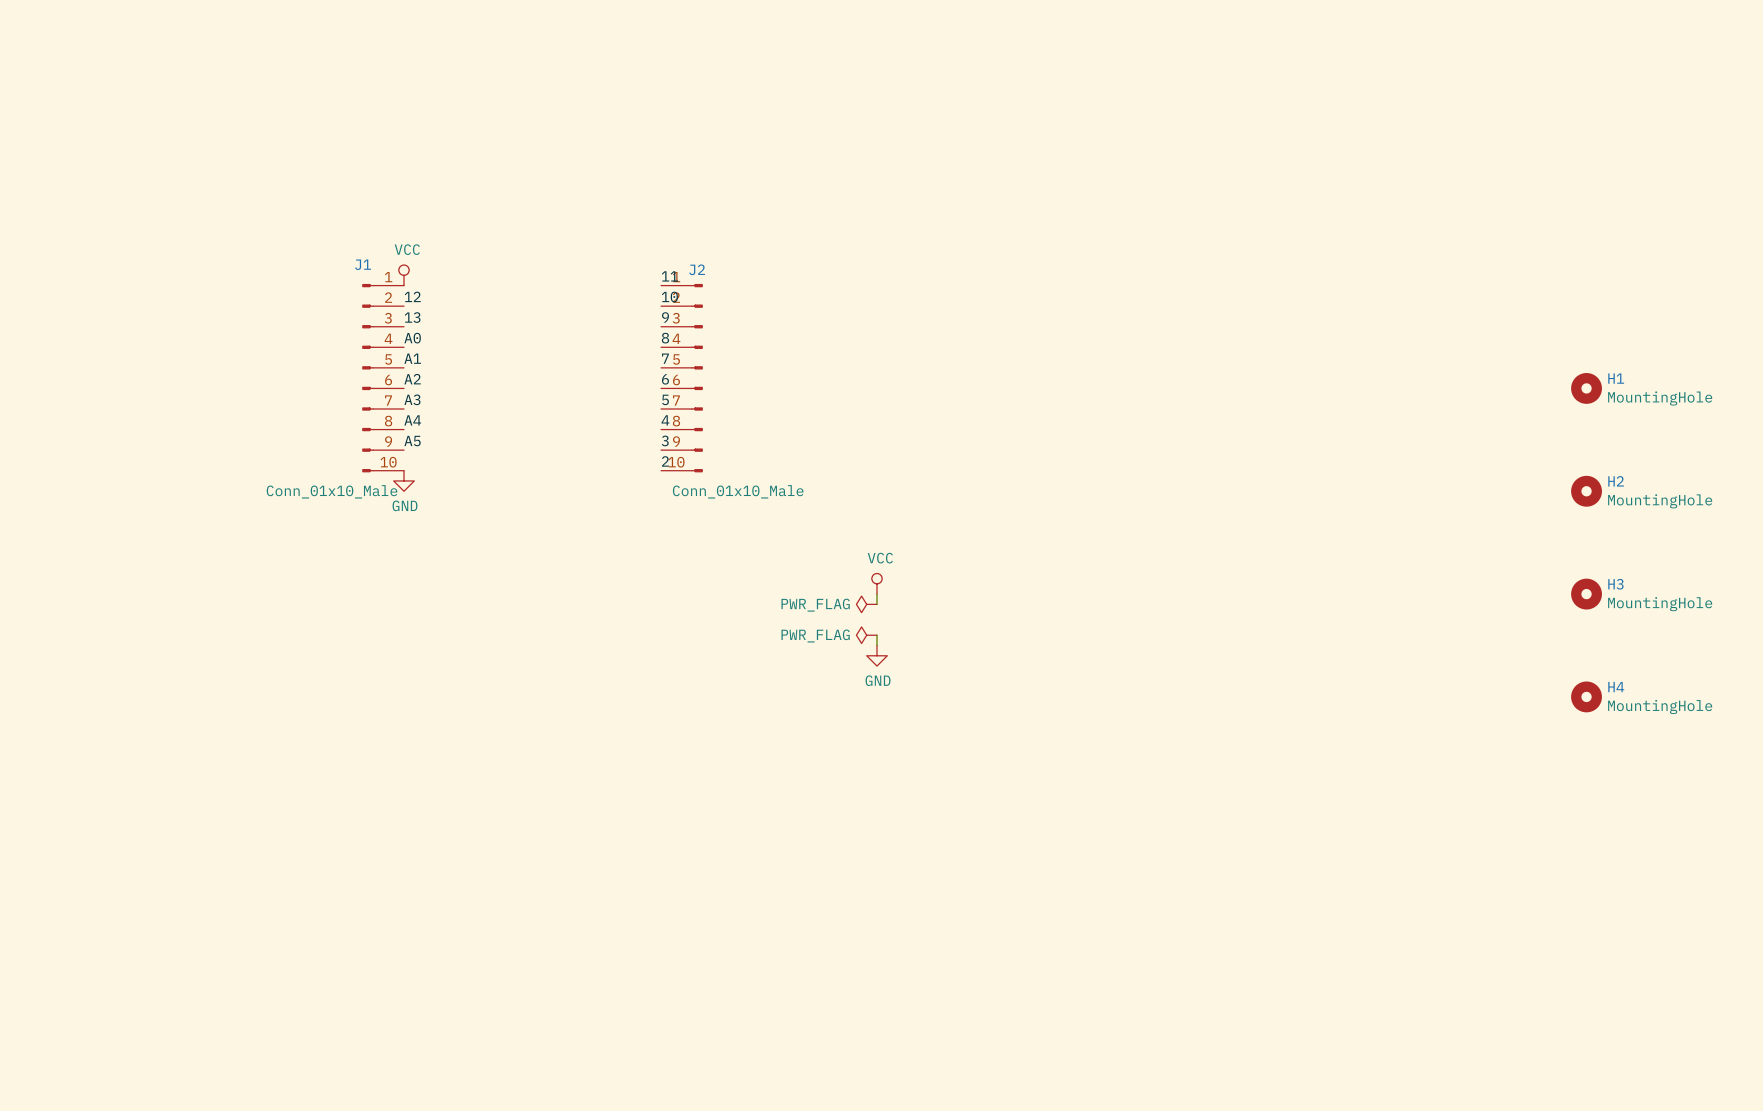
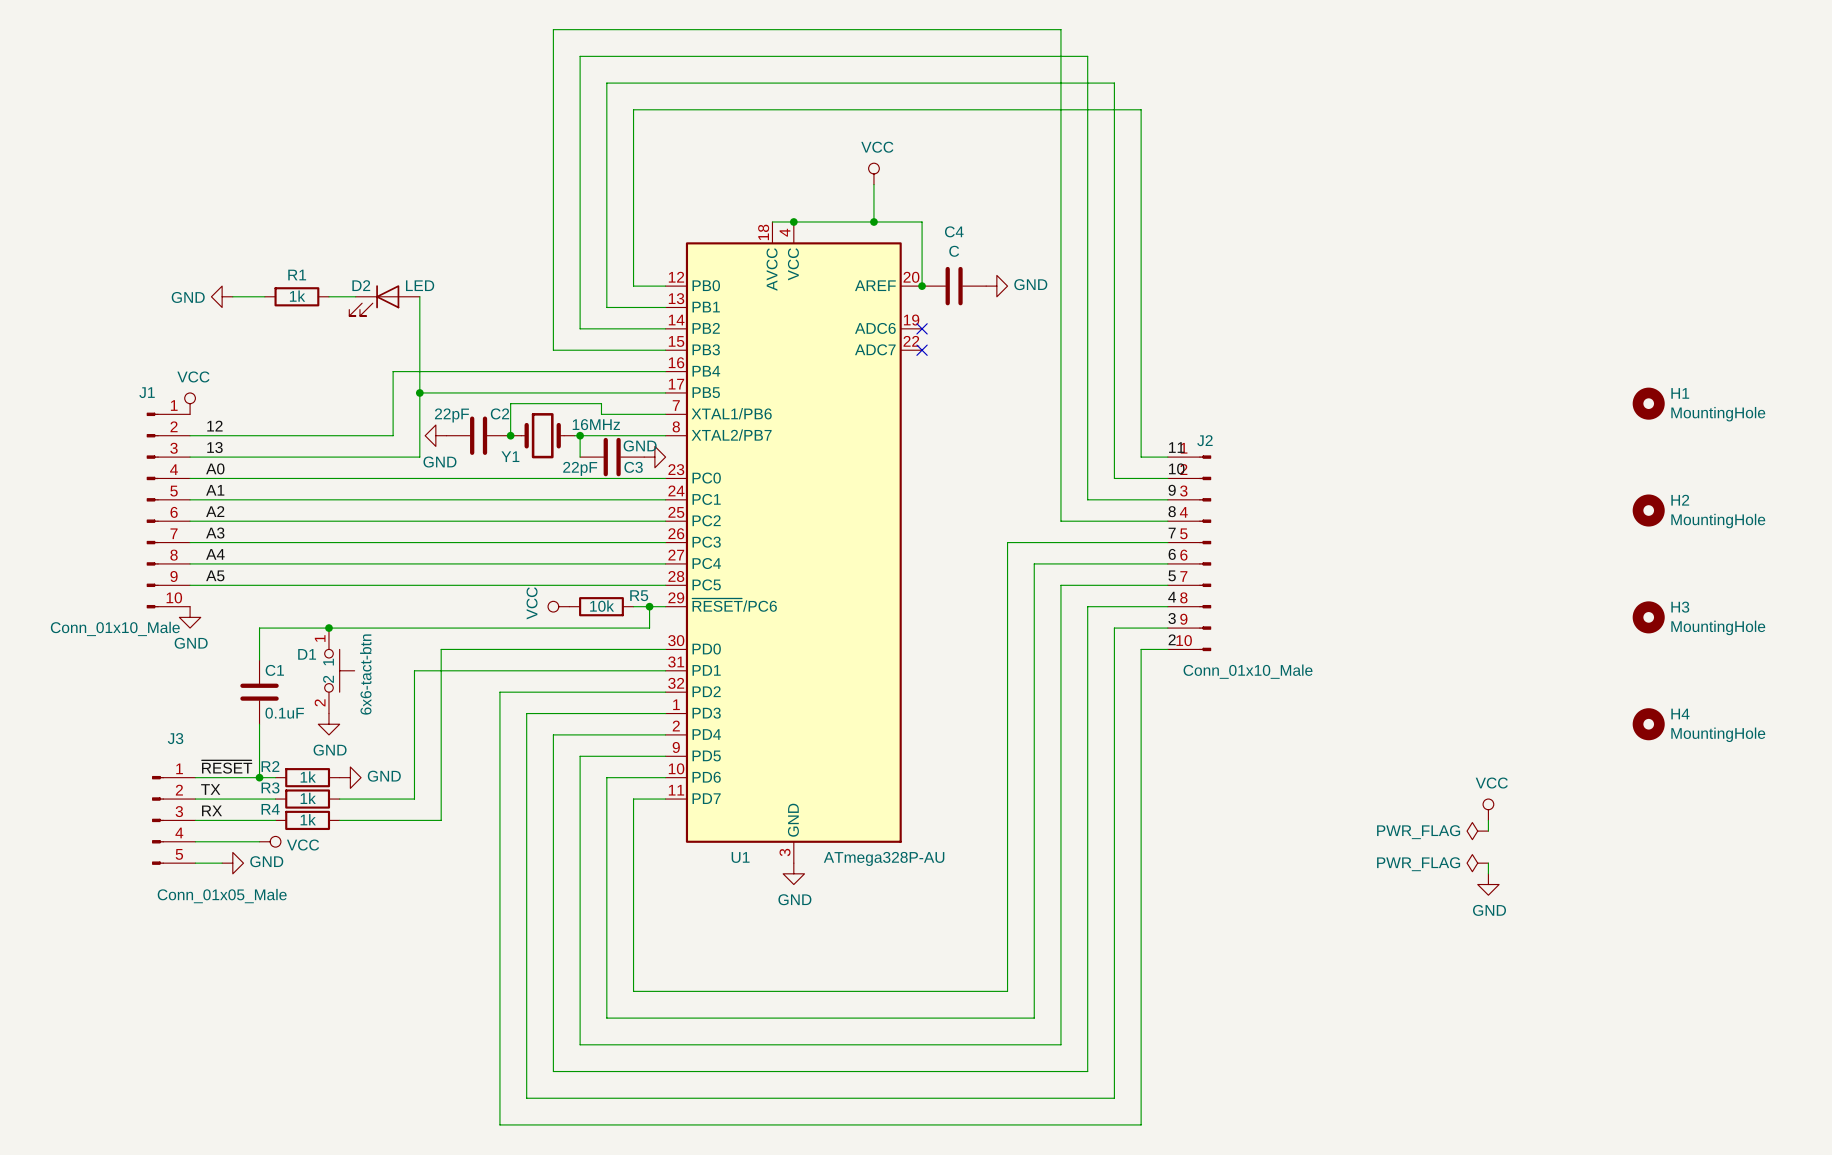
power symbol: none -> VCC (873, 173)
wire: none -> (873, 184) (873, 221)
wire: none -> (772, 221) (922, 221) (922, 286)
junction: none -> (793, 221)
junction: none -> (873, 221)
power symbol: VCC (403, 275) -> none
wire: none -> (665, 286) (633, 286) (633, 109) (1141, 109) (1141, 457) (1167, 457)
junction: none -> (922, 286)
C4: none -> C (954, 286)
power symbol: none -> GND (996, 286)
label: 11 (669, 276) -> none
power symbol: none -> GND (222, 296)
wire: none -> (232, 296) (264, 296)
R1: none -> 1k (296, 296)
wire: none -> (328, 296) (355, 296)
wire: none -> (419, 296) (419, 457) (190, 457)
D2: none -> LED (384, 300)
wire: none -> (665, 307) (606, 307) (606, 83) (1114, 83) (1114, 478) (1167, 478)
label: 12 (412, 296) -> none
label: 10 (669, 296) -> none
wire: none -> (665, 328) (580, 328) (580, 56) (1087, 56) (1087, 499) (1167, 499)
no-connect mark: none -> (922, 328)
label: 13 (412, 317) -> none
label: 9 (665, 317) -> none
wire: none -> (665, 350) (553, 350) (553, 29) (1060, 29) (1060, 521) (1167, 521)
no-connect mark: none -> (922, 350)
label: A0 (412, 338) -> none
label: 8 (665, 338) -> none
wire: none -> (665, 371) (393, 371) (393, 435) (190, 435)
label: A1 (412, 358) -> none
label: 7 (665, 358) -> none
J1 position: (383, 378) -> (168, 510)
wire: none -> (419, 392) (665, 392)
junction: none -> (419, 392)
J2 position: (681, 378) -> (1189, 553)
label: A2 (412, 379) -> none
label: 6 (665, 379) -> none
power symbol: none -> VCC (190, 403)
wire: none -> (665, 414) (601, 414) (601, 403) (510, 403) (510, 435)
label: A3 (412, 399) -> none
label: 5 (665, 399) -> none
label: none -> 12 (214, 426)
C2: none -> 22pF (478, 435)
junction: none -> (510, 435)
Y1: none -> 16MHz (542, 435)
wire: none -> (574, 435) (665, 435)
wire: none -> (580, 435) (580, 457)
junction: none -> (580, 435)
label: A4 (412, 420) -> none
label: 4 (665, 420) -> none
label: none -> 13 (214, 447)
label: none -> 11 (1176, 447)
C3: none -> 22pF (612, 457)
power symbol: none -> GND (654, 457)
label: 3 (665, 440) -> none
label: A5 (412, 441) -> none
label: none -> A0 (215, 468)
label: none -> 10 (1176, 468)
wire: none -> (190, 478) (665, 478)
label: 2 (665, 461) -> none
label: none -> A1 (215, 490)
label: none -> 9 (1172, 490)
wire: none -> (190, 499) (665, 499)
power symbol rotation: 0° (403, 480) -> 90° clockwise (435, 435)
power symbol position: GND (403, 480) -> GND (435, 435)
label: none -> A2 (215, 511)
label: none -> 8 (1172, 511)
wire: none -> (190, 521) (665, 521)
label: none -> A3 (215, 533)
label: none -> 7 (1172, 533)
wire: none -> (190, 542) (665, 542)
U1: none -> ATmega328P-AU (793, 542)
wire: none -> (1167, 542) (1007, 542) (1007, 991) (633, 991) (633, 799) (665, 799)
label: none -> A4 (215, 554)
label: none -> 6 (1172, 554)
wire: none -> (190, 563) (665, 563)
wire: none -> (1167, 563) (1034, 563) (1034, 1018) (606, 1018) (606, 777) (665, 777)
label: none -> A5 (215, 575)
label: none -> 5 (1172, 575)
wire: none -> (190, 585) (665, 585)
wire: none -> (1167, 585) (1060, 585) (1060, 1044) (580, 1044) (580, 756) (665, 756)
label: none -> 4 (1172, 597)
power symbol: none -> VCC (558, 606)
R5: none -> 10k (601, 606)
wire: none -> (633, 606) (665, 606)
wire: none -> (649, 606) (649, 628) (259, 628) (259, 660)
junction: none -> (649, 606)
power symbol: VCC (877, 583) -> none
wire: none -> (1167, 606) (1087, 606) (1087, 1071) (553, 1071) (553, 734) (665, 734)
power symbol: none -> GND (190, 617)
wire: (877, 594) (877, 604) -> none
label: none -> 3 (1172, 618)
junction: none -> (328, 628)
power symbol: PWR_FLAG (866, 604) -> none
wire: none -> (1167, 628) (1114, 628) (1114, 1098) (526, 1098) (526, 713) (665, 713)
label: none -> 2 (1172, 639)
wire: none -> (665, 649) (441, 649) (441, 820) (339, 820)
wire: none -> (1167, 649) (1141, 649) (1141, 1124) (499, 1124) (499, 692) (665, 692)
power symbol: PWR_FLAG (866, 635) -> none
wire: (877, 635) (877, 645) -> none
D1: none -> 6x6-tact-btn (339, 670)
wire: none -> (665, 670) (414, 670) (414, 799) (339, 799)
power symbol: GND (877, 655) -> none
C1: none -> 0.1uF (259, 692)
wire: none -> (259, 724) (259, 777)
power symbol: none -> GND (328, 724)
label: none -> ~{RESET} (227, 766)
wire: none -> (195, 777) (275, 777)
junction: none -> (259, 777)
R2: none -> 1k (307, 777)
power symbol: none -> GND (350, 777)
label: none -> TX (210, 789)
wire: none -> (195, 799) (275, 799)
R3: none -> 1k (307, 799)
power symbol: none -> VCC (1488, 809)
label: none -> RX (212, 810)
J3: none -> Conn_01x05_Male (173, 820)
wire: none -> (195, 820) (275, 820)
R4: none -> 1k (307, 820)
wire: none -> (1488, 820) (1488, 831)
power symbol: none -> PWR_FLAG (1477, 831)
wire: none -> (195, 841) (259, 841)
power symbol: none -> VCC (270, 841)
wire: none -> (195, 863) (222, 863)
power symbol: none -> GND (232, 863)
power symbol: none -> PWR_FLAG (1477, 863)
wire: none -> (1488, 863) (1488, 873)
power symbol: none -> GND (793, 873)
power symbol: none -> GND (1488, 884)

